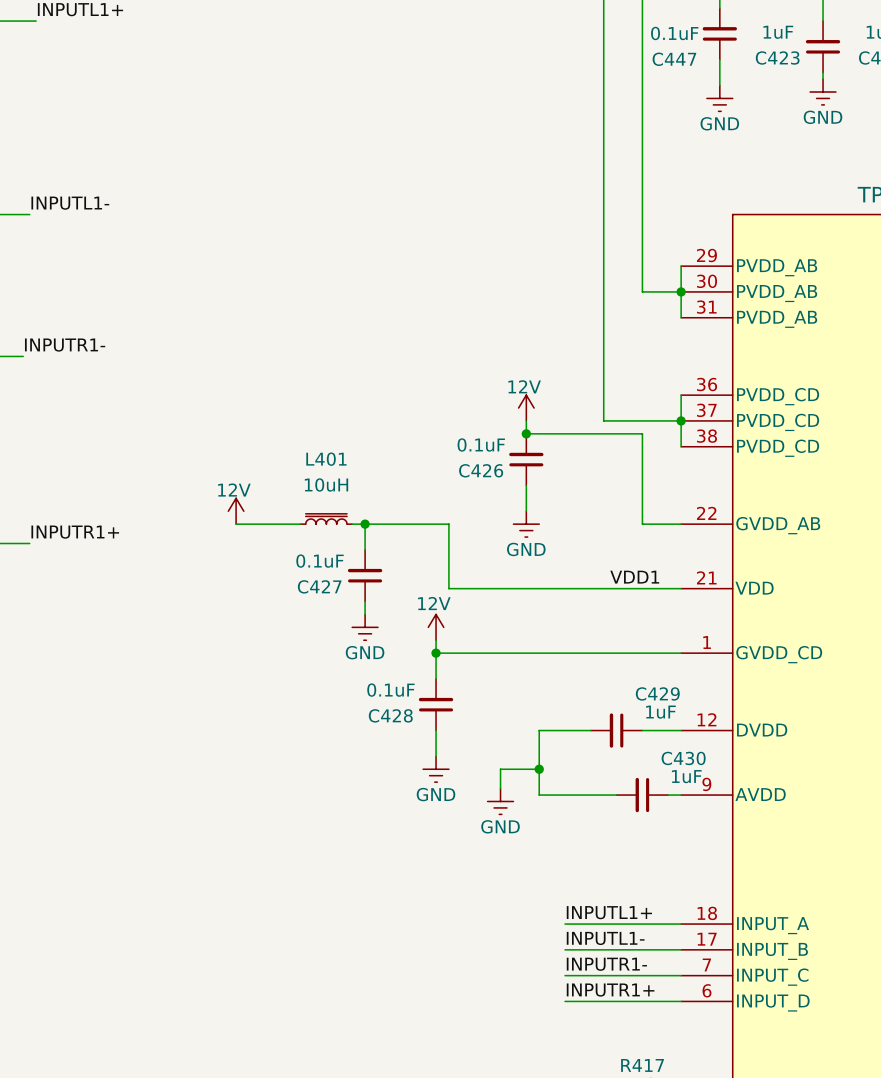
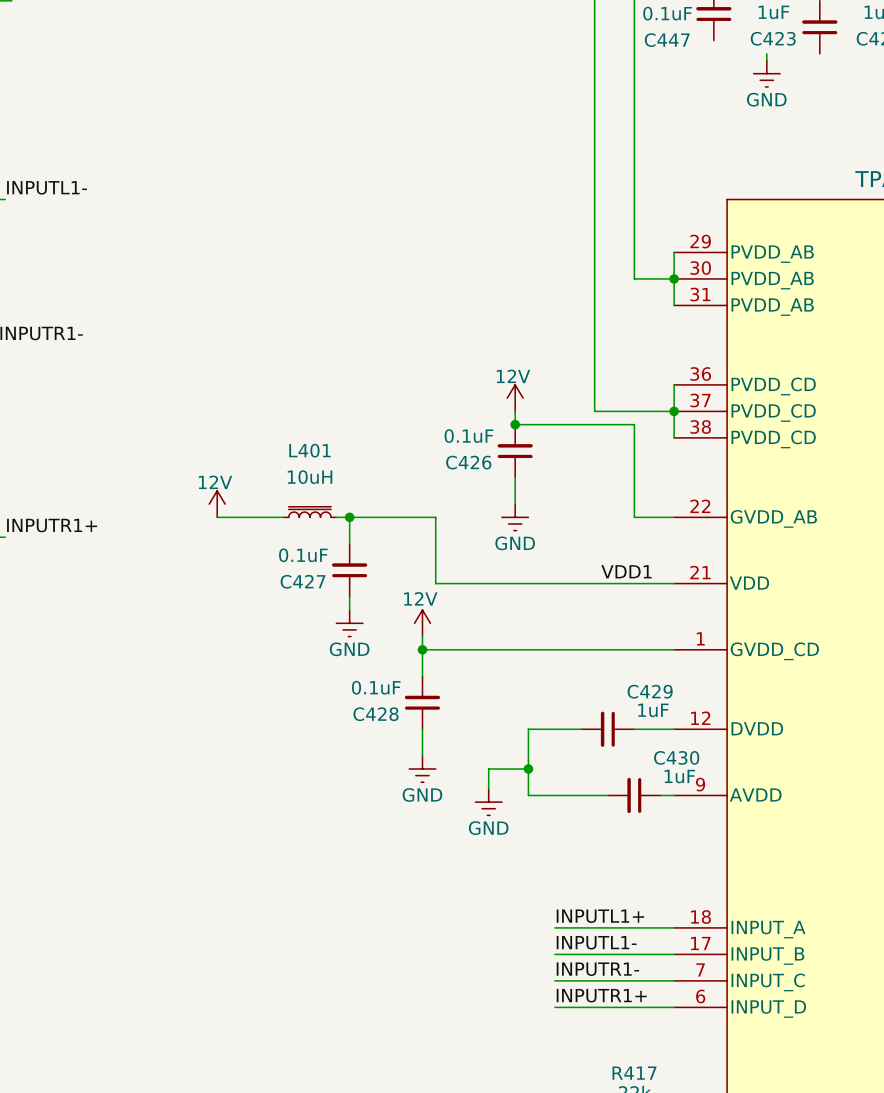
wire: (719, 59) (719, 85) -> none
wire: (823, 72) (823, 79) -> (766, 53) (766, 60)
power symbol: none -> GND (766, 73)
power symbol: GND (823, 92) -> none
power symbol: GND (719, 98) -> none

